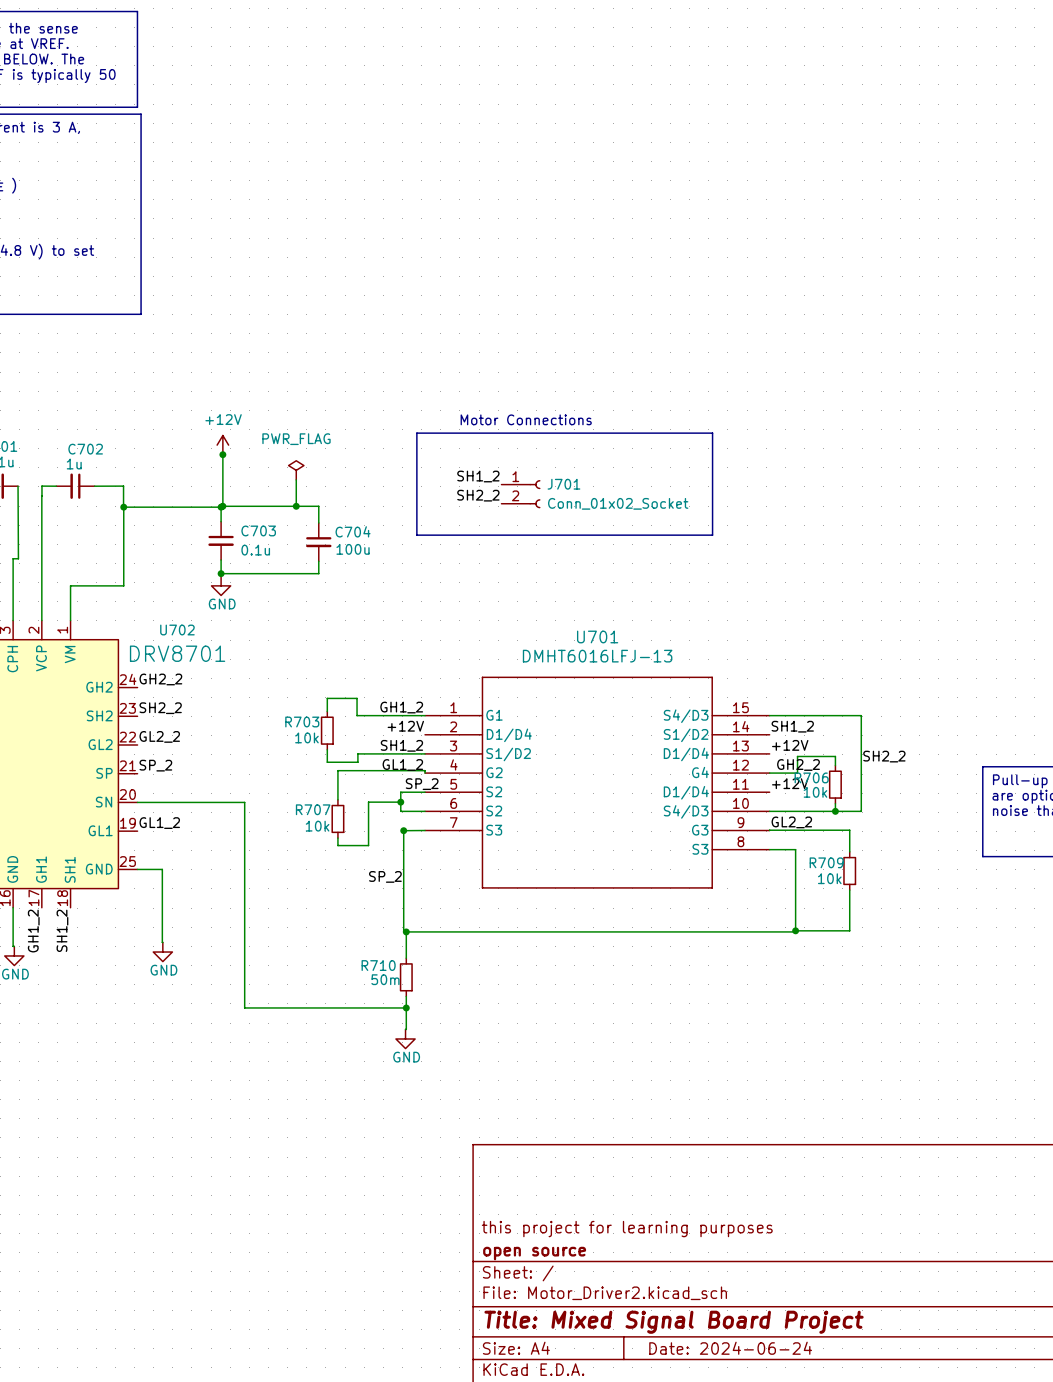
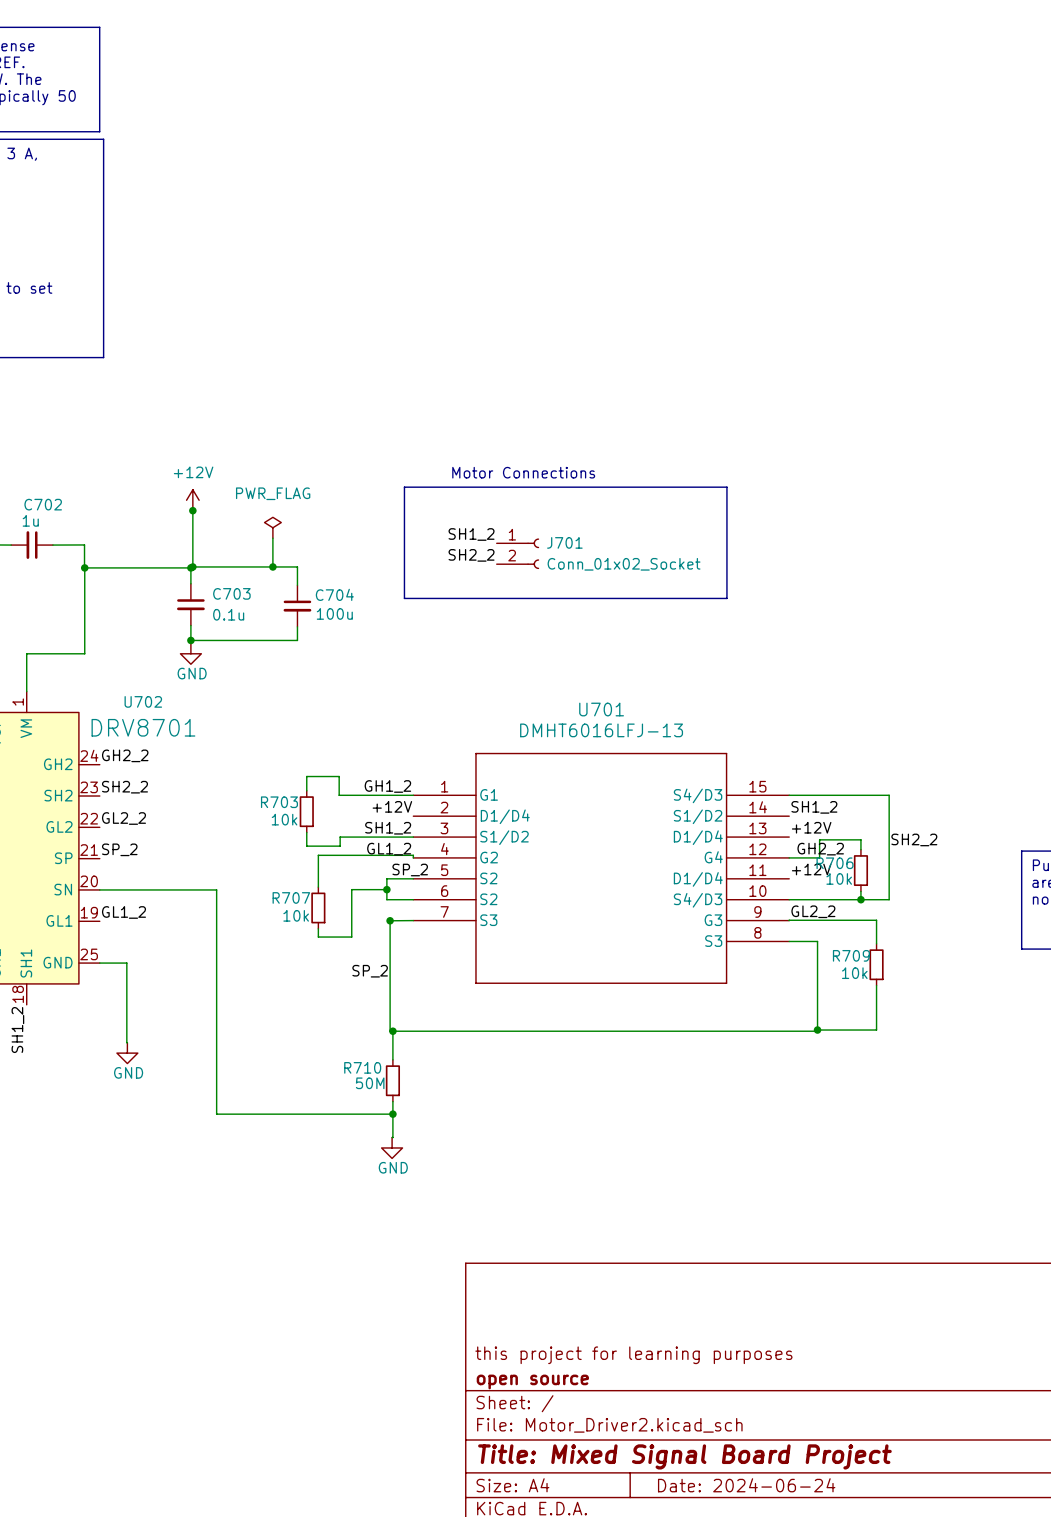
R710 value: 50m (385, 979) -> 50M (370, 1083)

